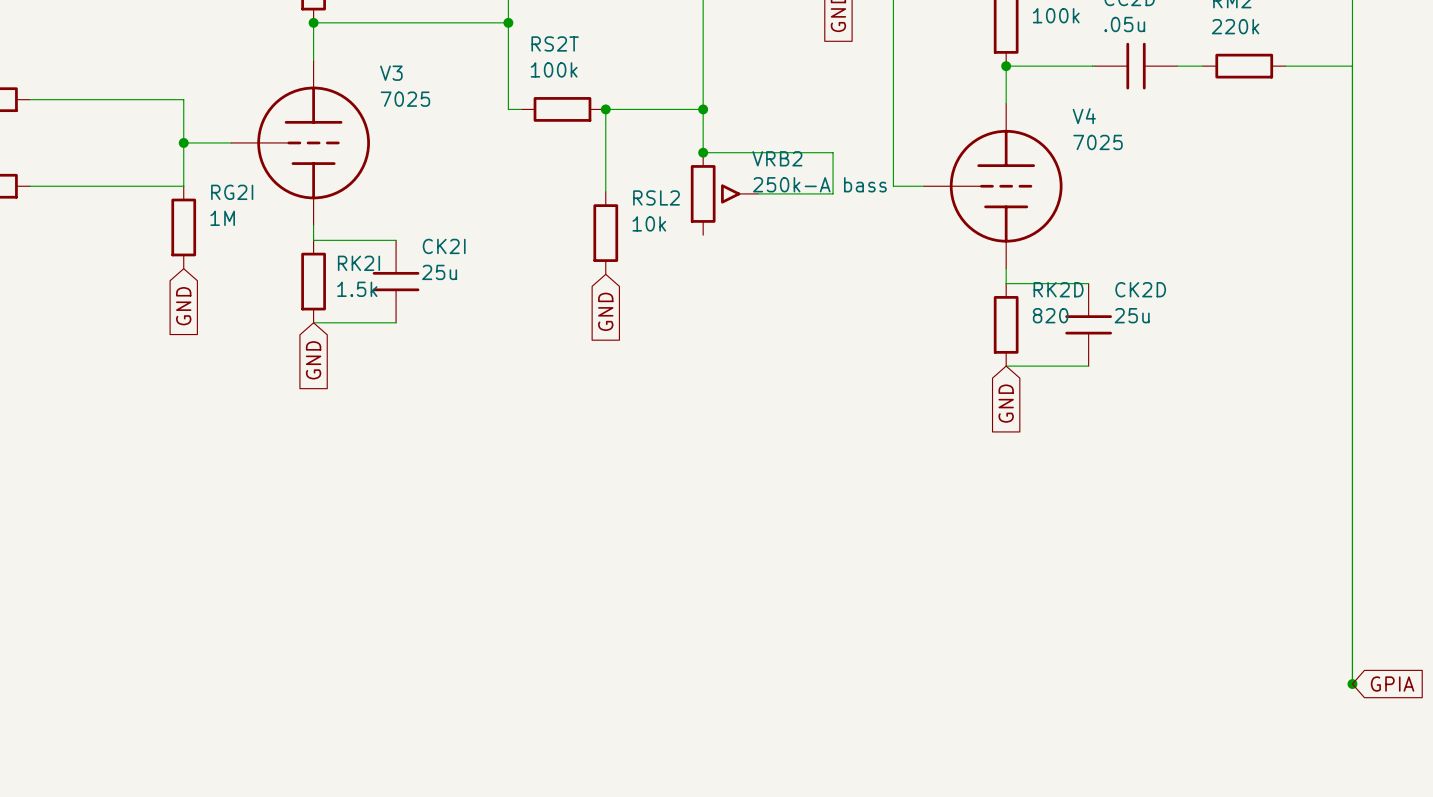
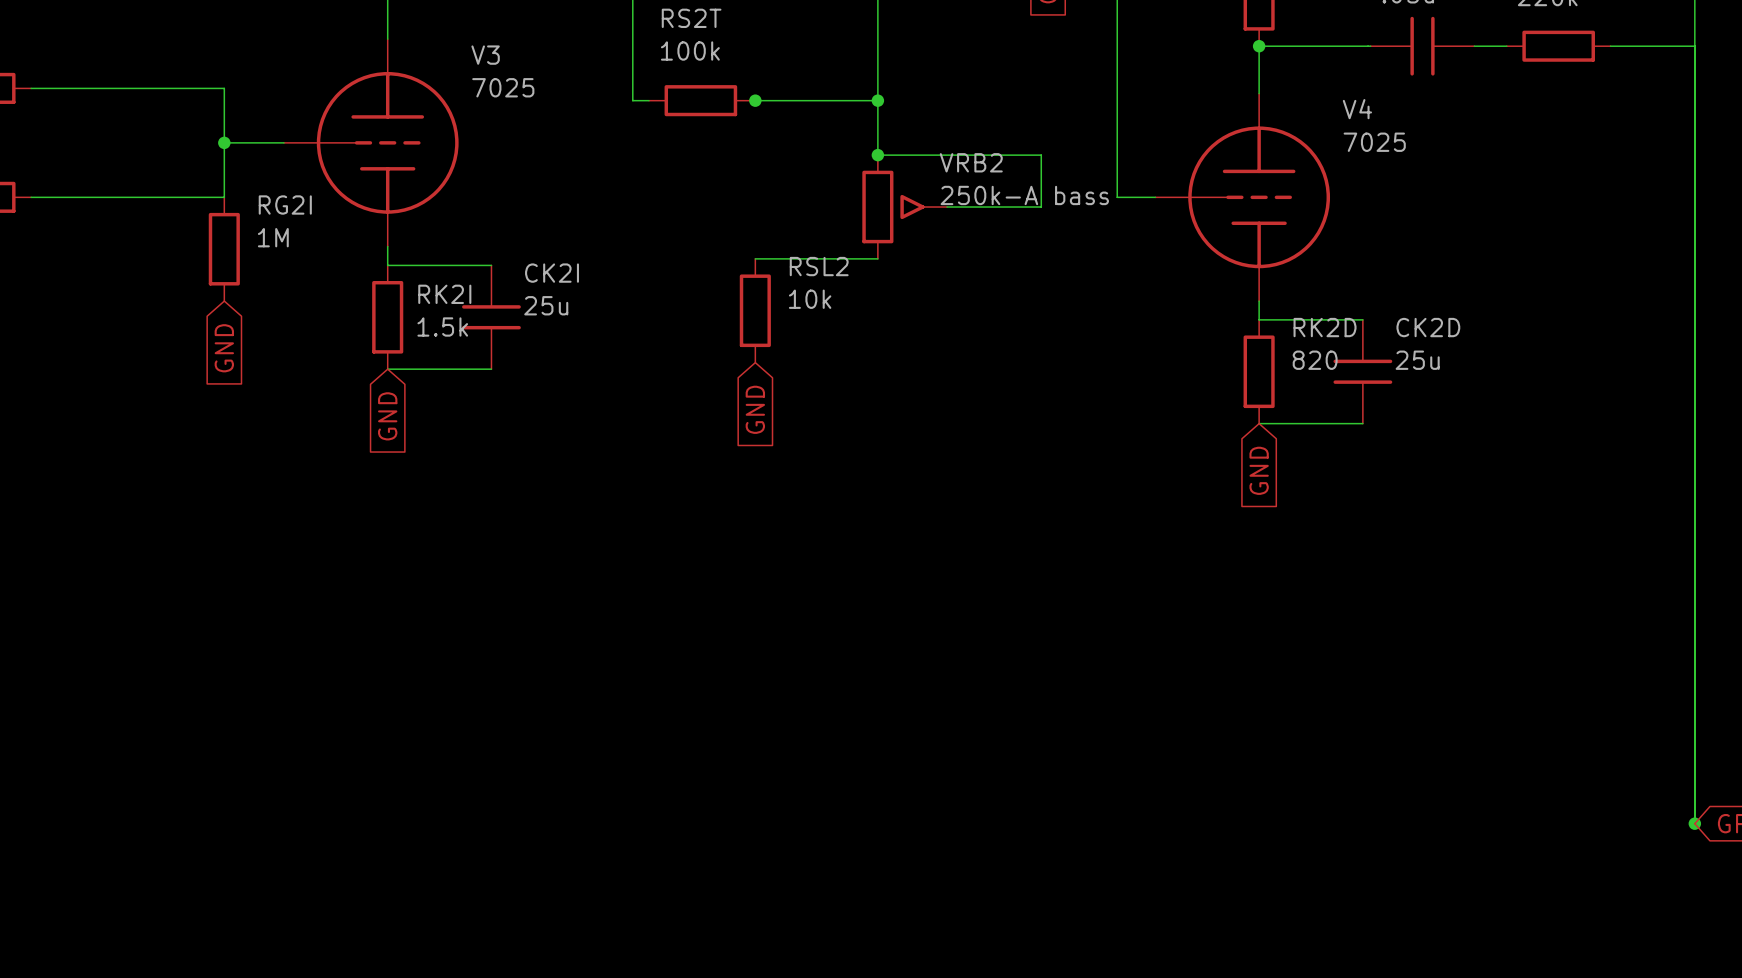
wire: (605, 109) (605, 191) -> none
RSL2 position: (605, 233) -> (755, 310)
wire: none -> (755, 258) (877, 258)
global label position: GND (605, 311) -> GND (755, 409)

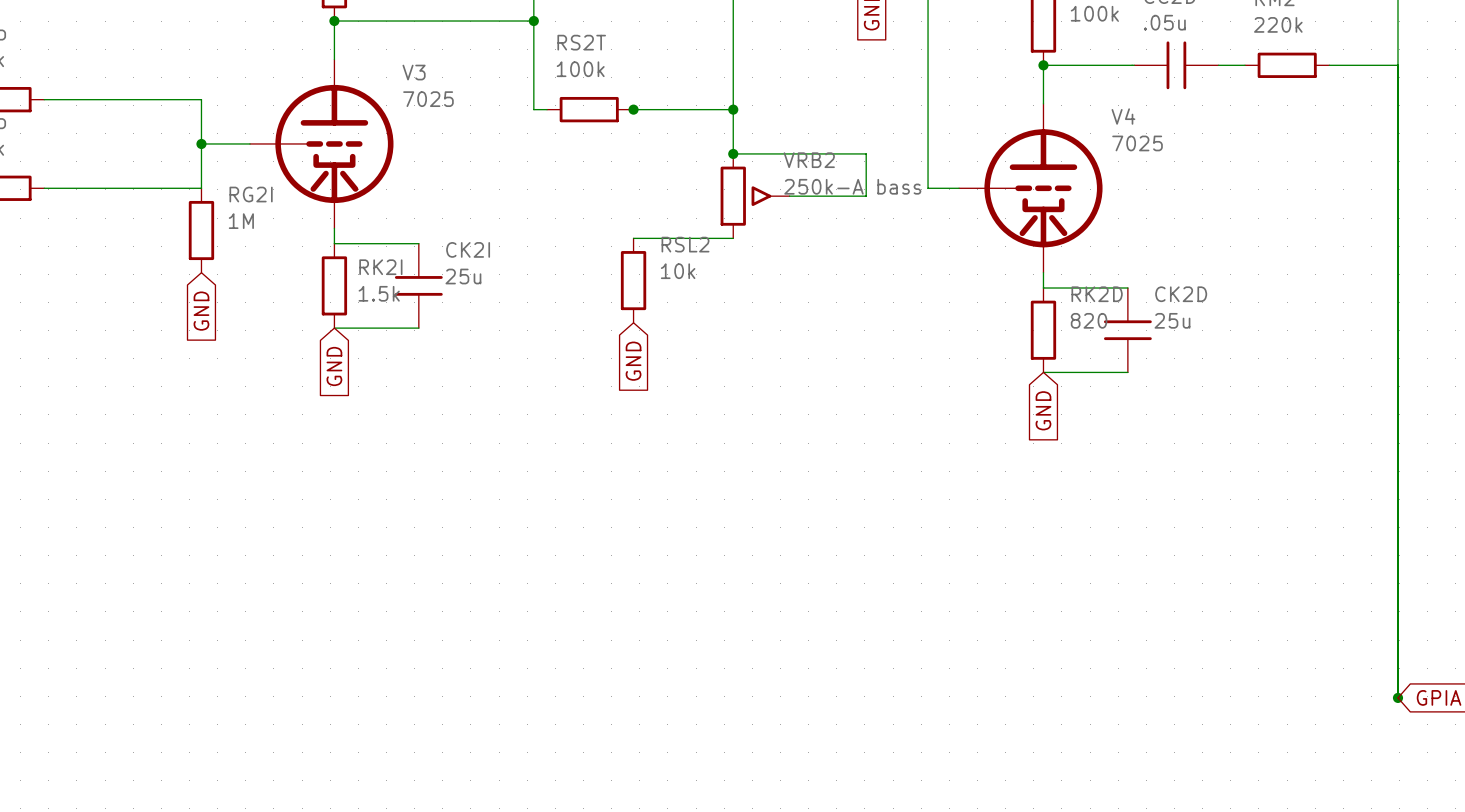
V3 symbol: [283, 39, 459, 247] -> [249, 59, 394, 229]
V4 symbol: [1155, 93, 1331, 302] -> [959, 103, 1103, 273]

